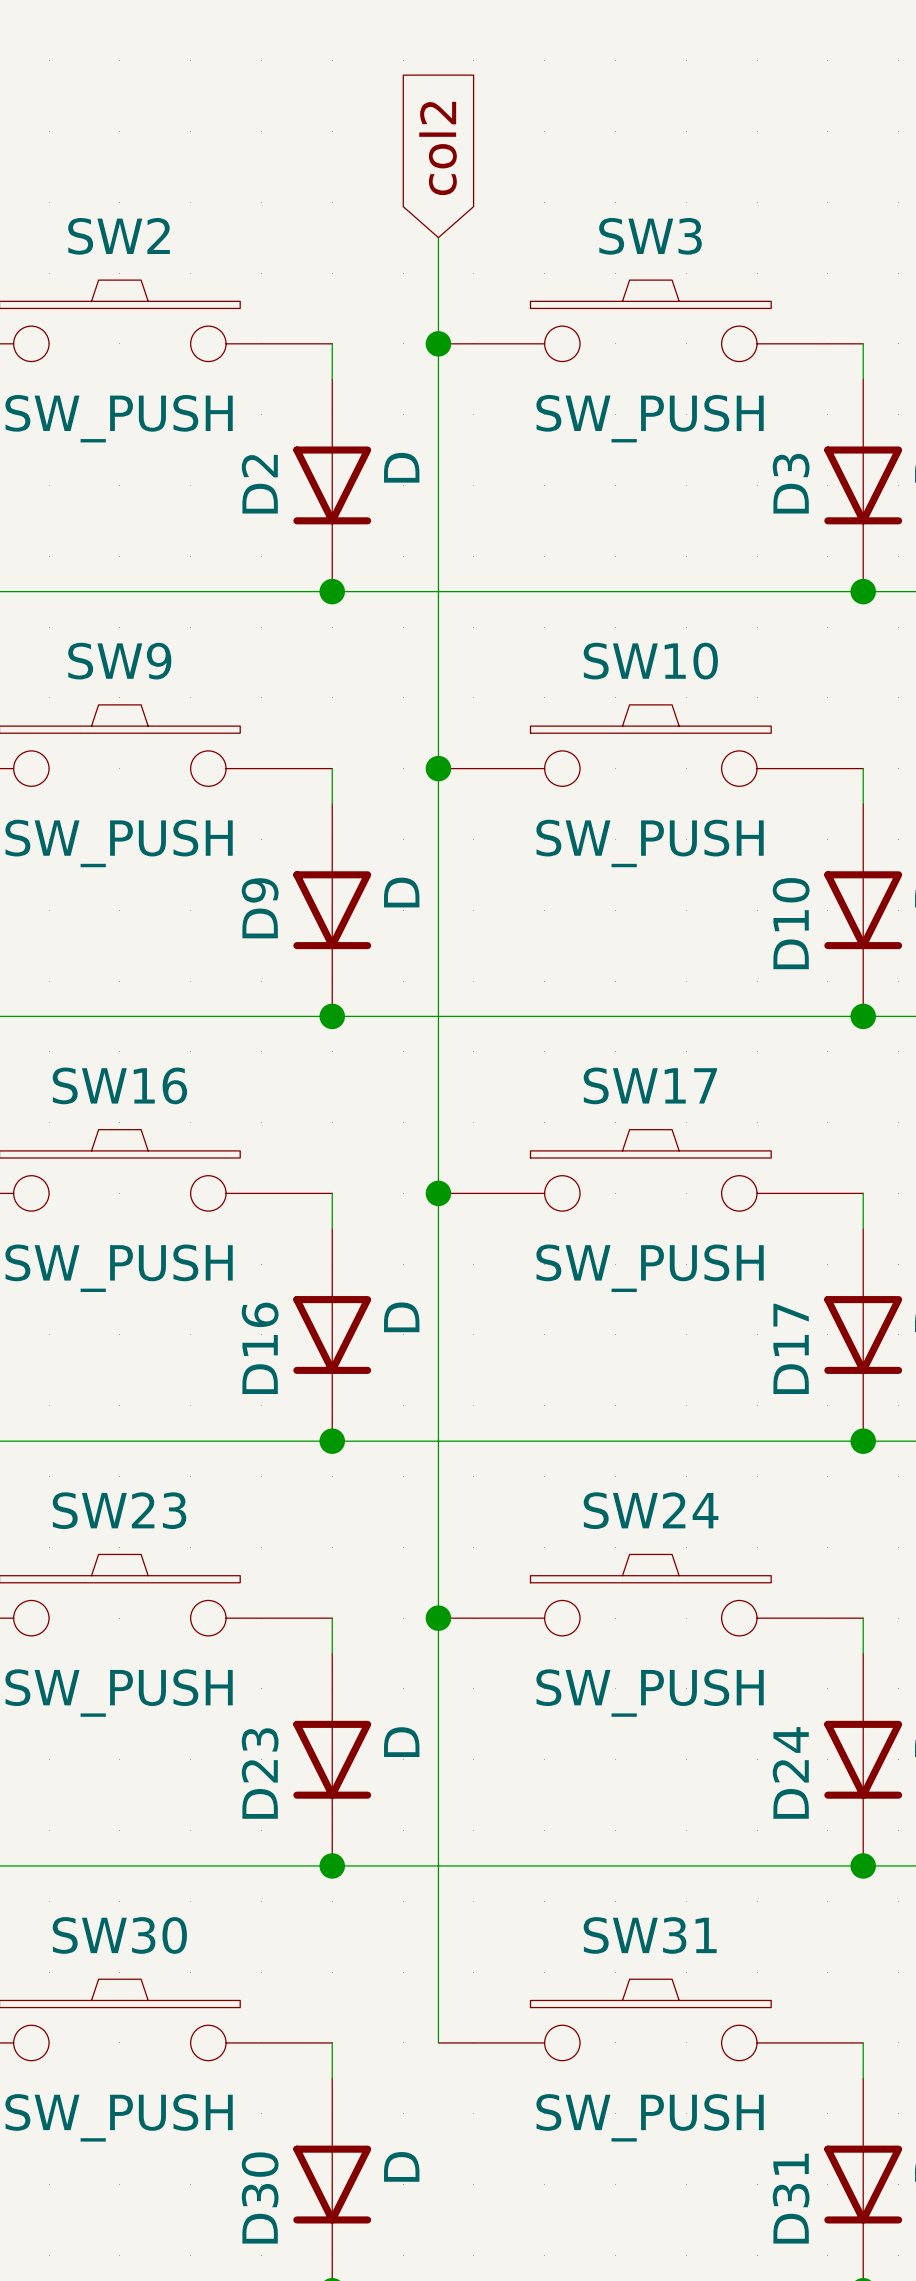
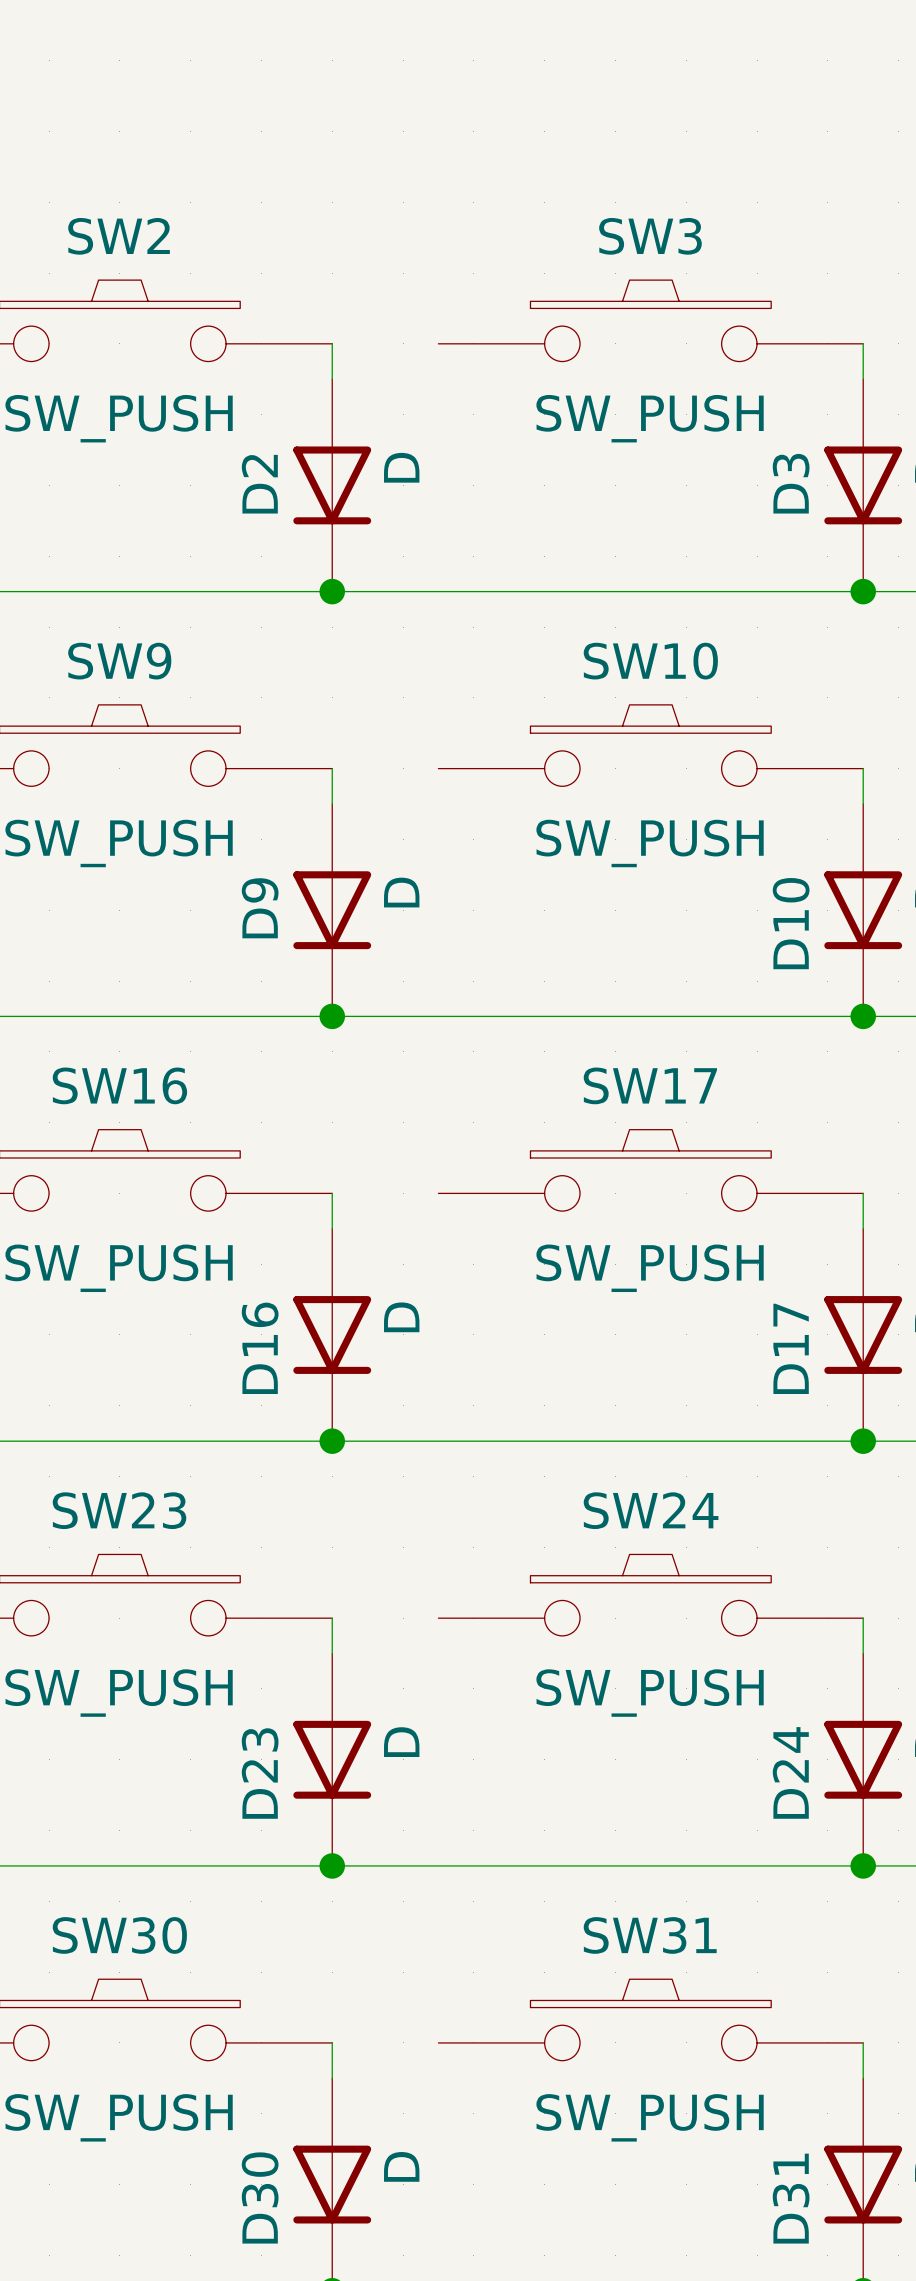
global label: col2 (438, 148) -> none
wire: (438, 237) (438, 2042) -> none
junction: (438, 343) -> none
junction: (438, 768) -> none
junction: (438, 1193) -> none
junction: (438, 1618) -> none

